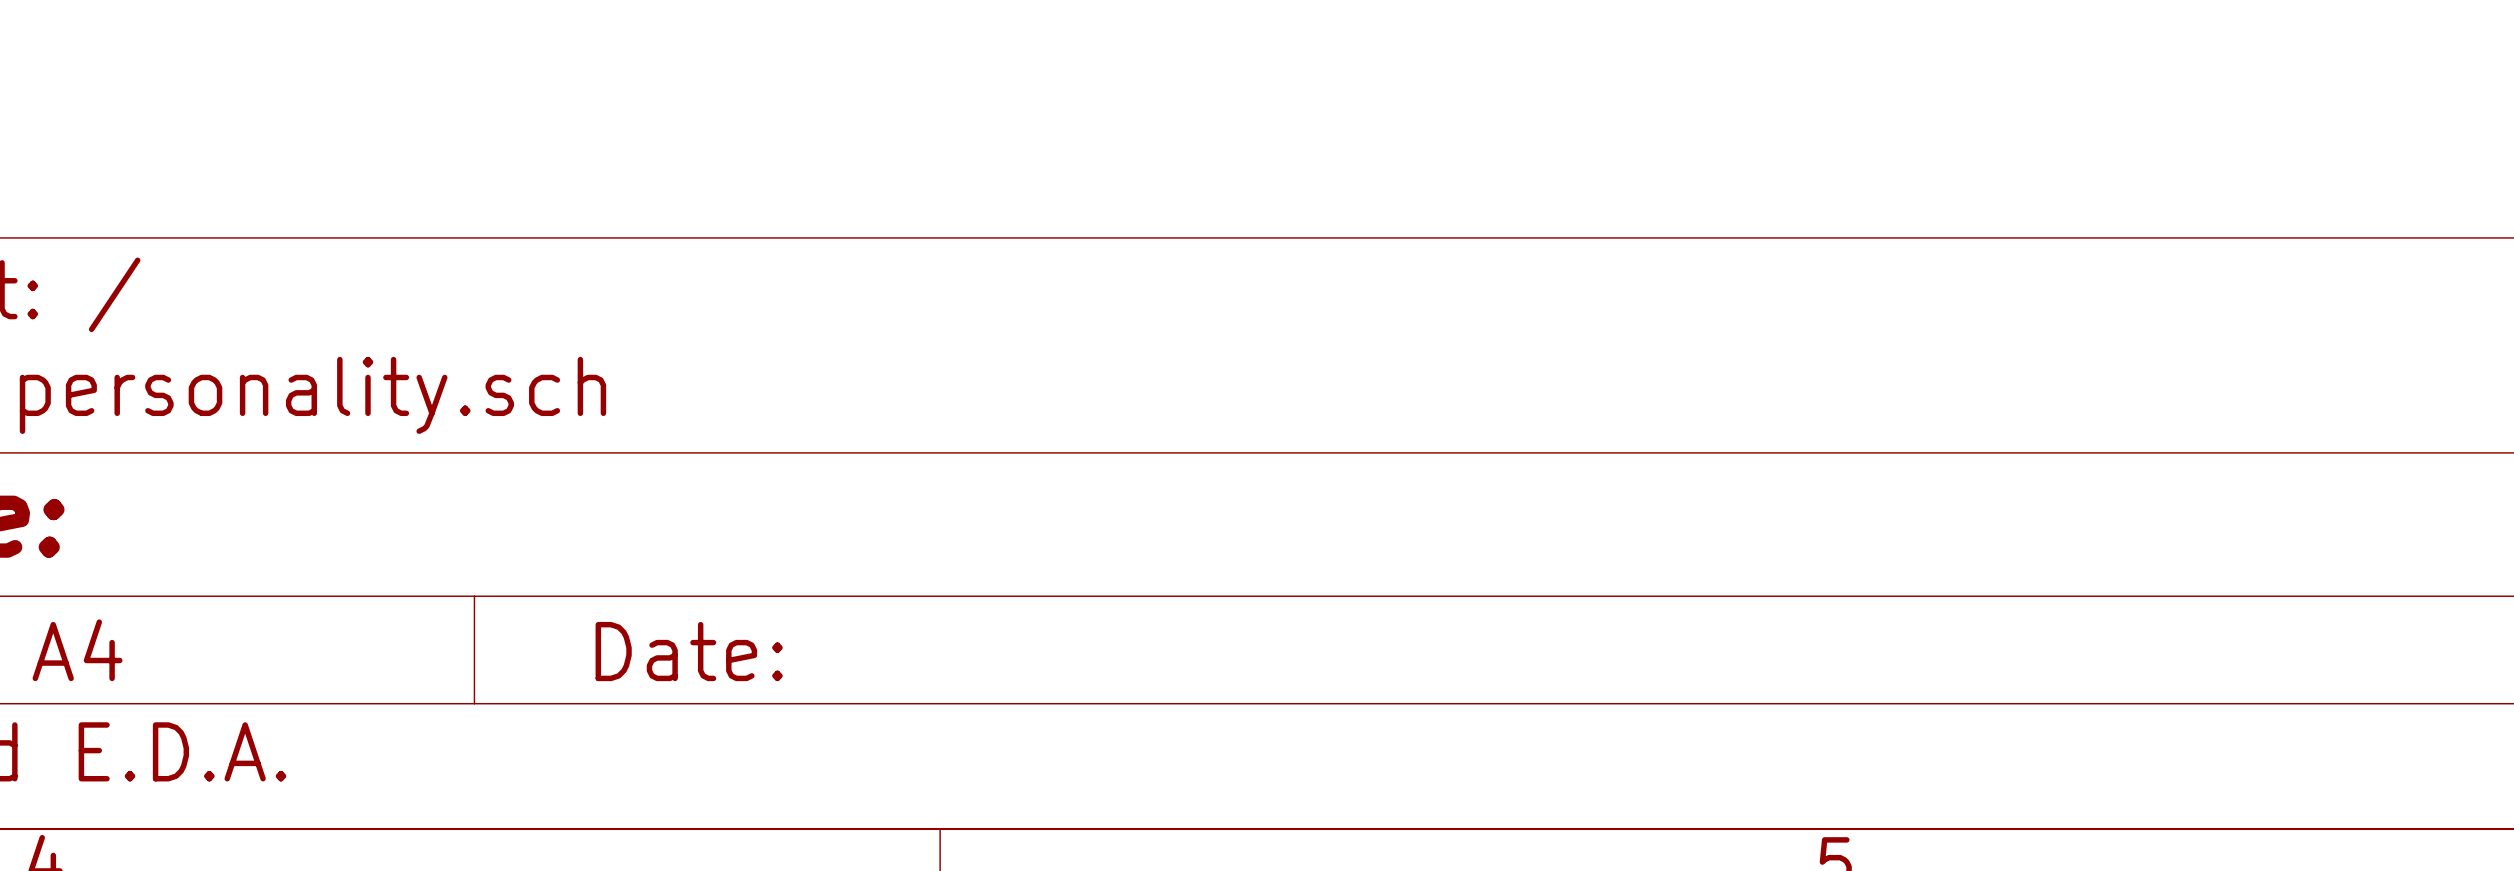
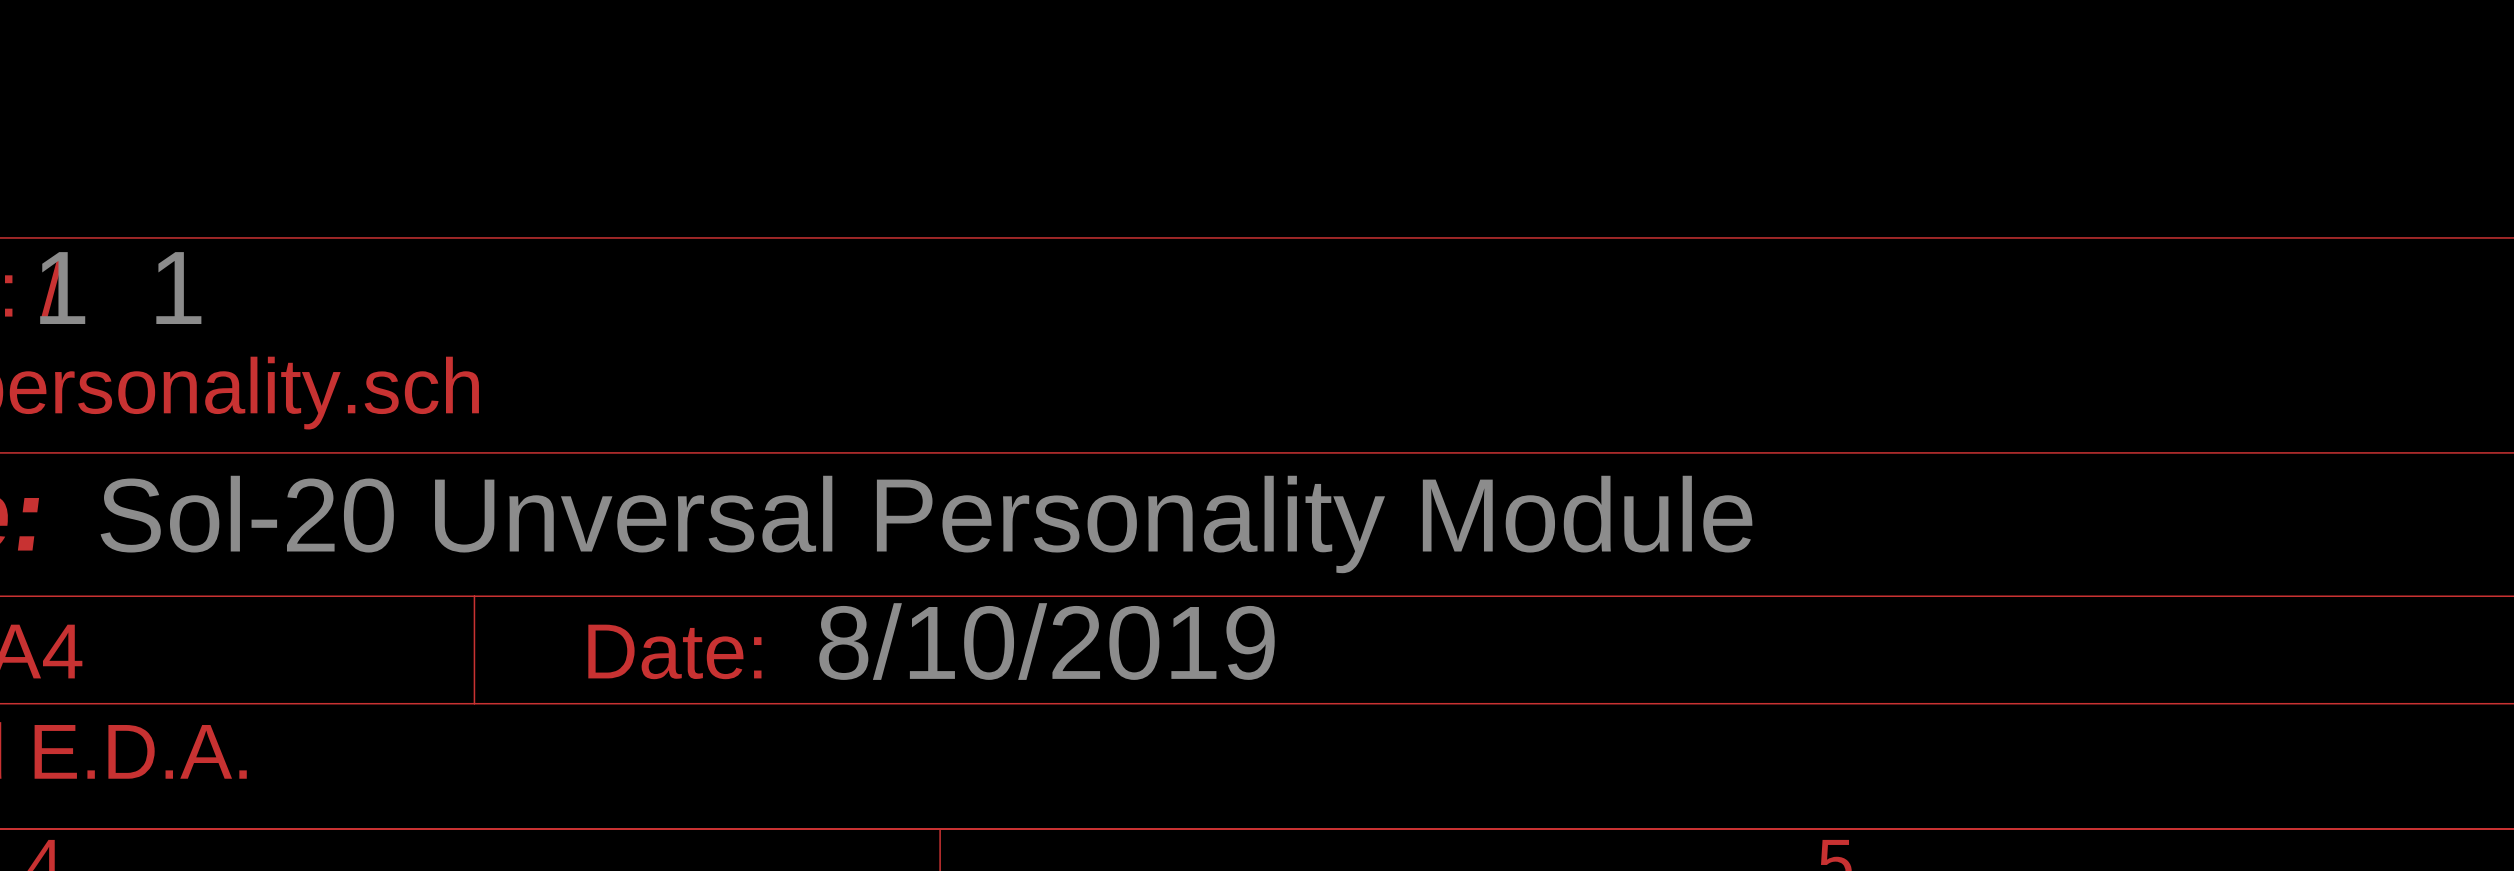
text: none -> 1 1 (120, 288)
text: none -> Sol-20 Unversal Personality Module (926, 524)
text: none -> 8/10/2019 (1047, 641)

